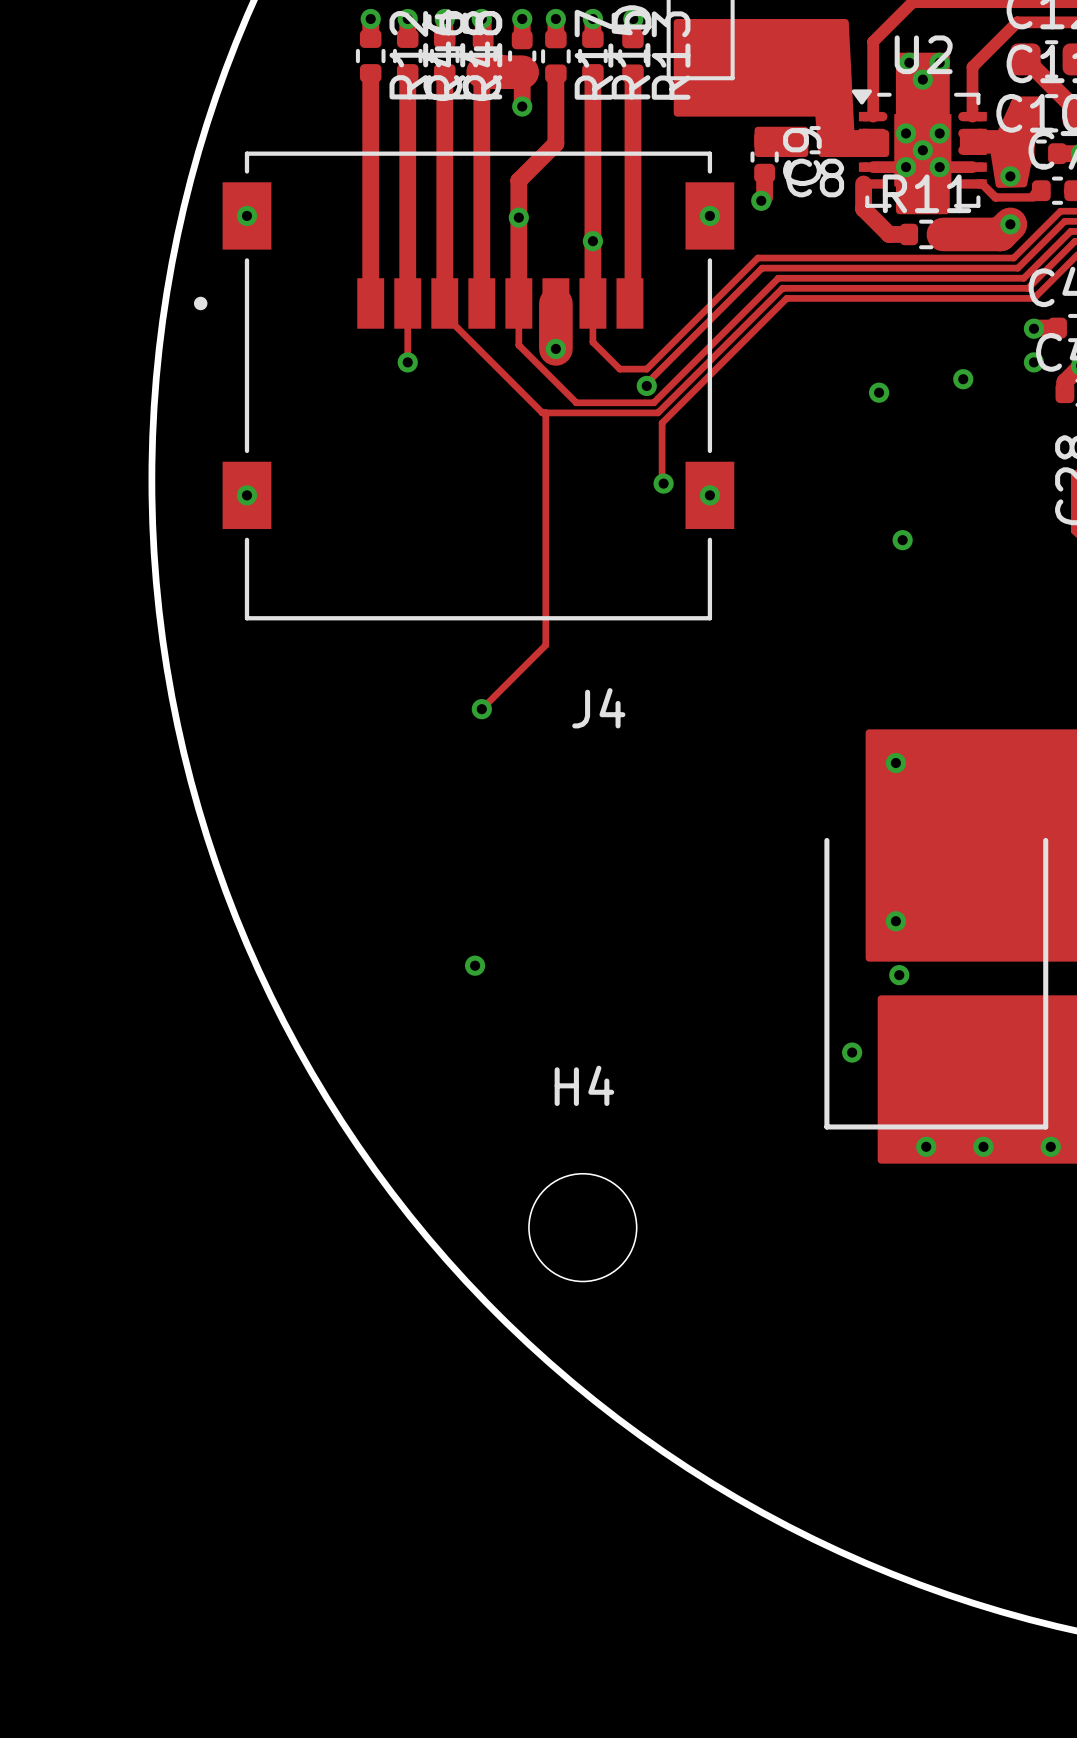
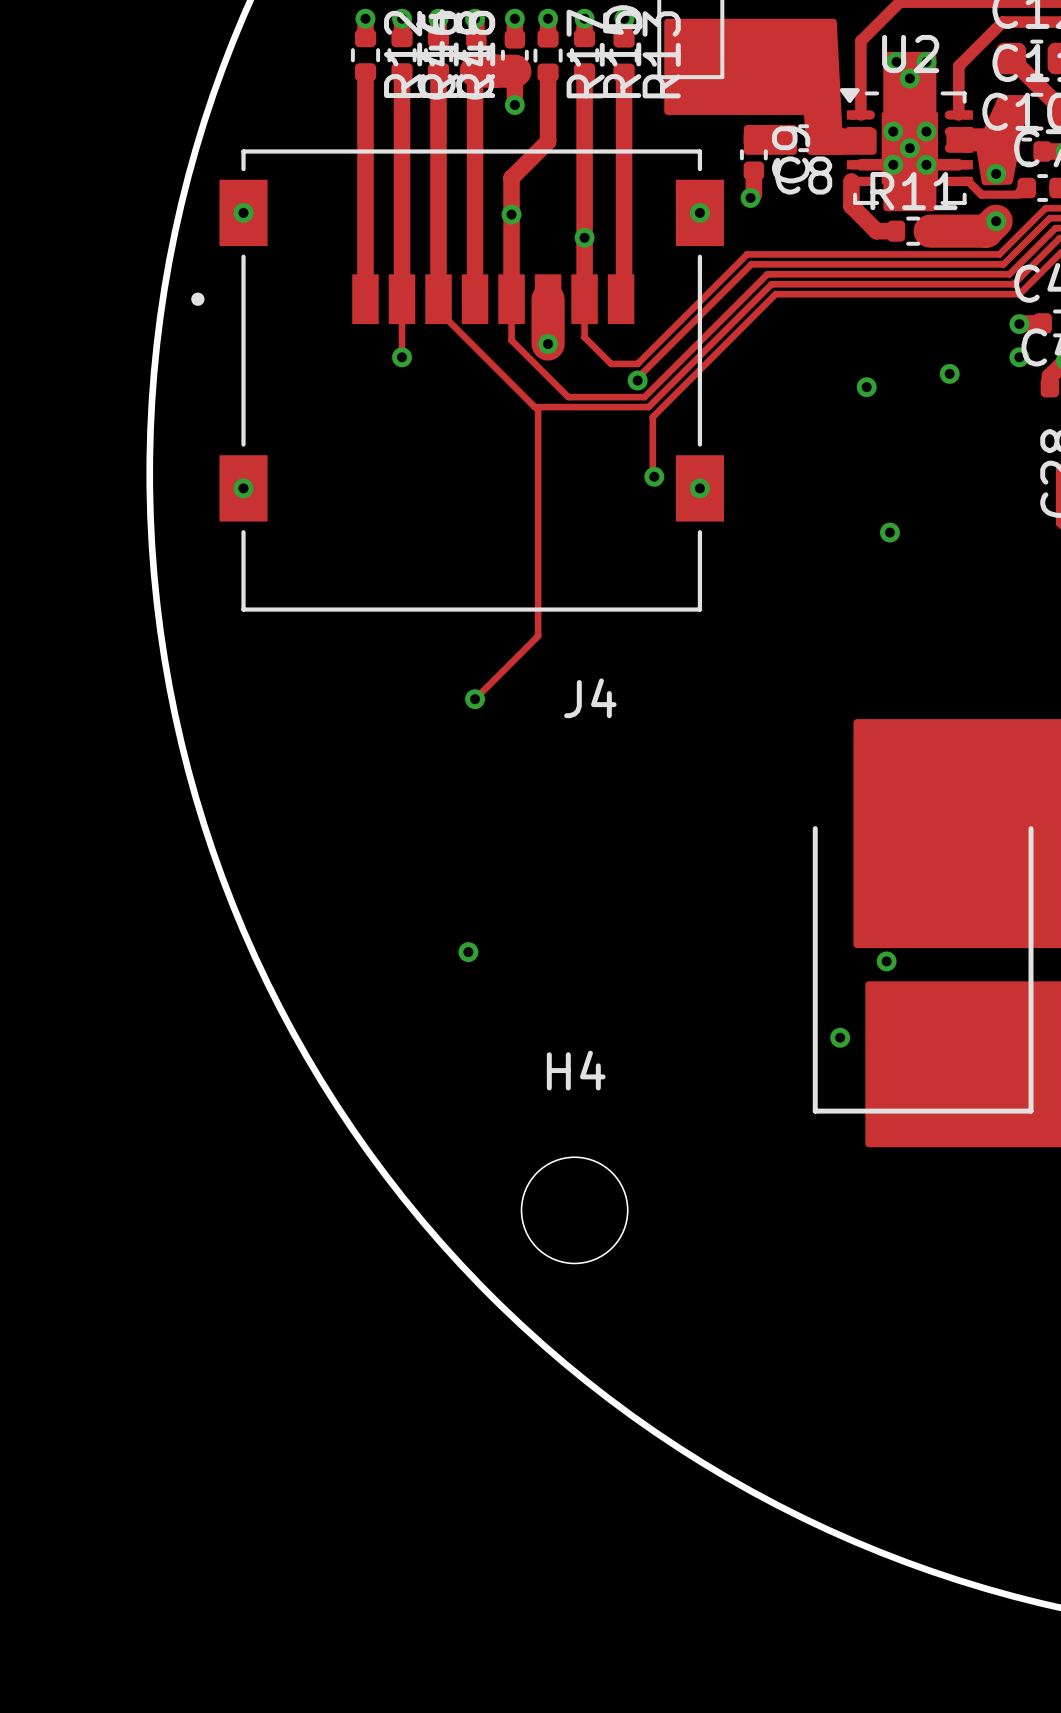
via: (895, 763) -> none
via: (895, 921) -> none
via: (926, 1146) -> none
via: (983, 1146) -> none
via: (1050, 1146) -> none

